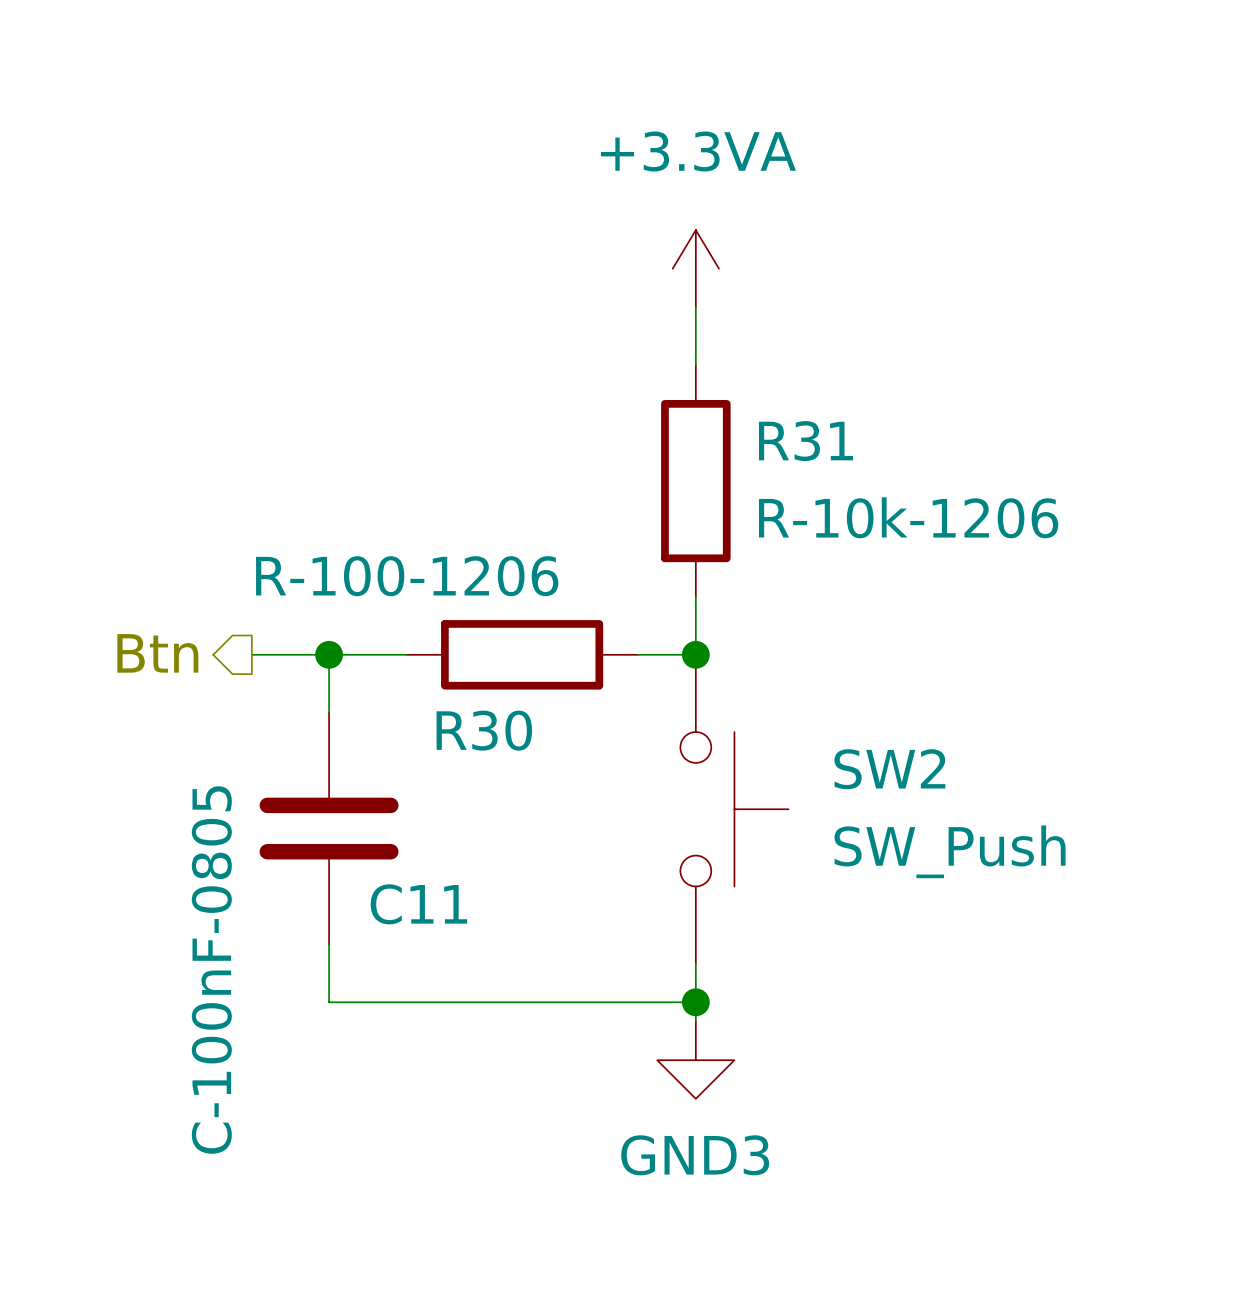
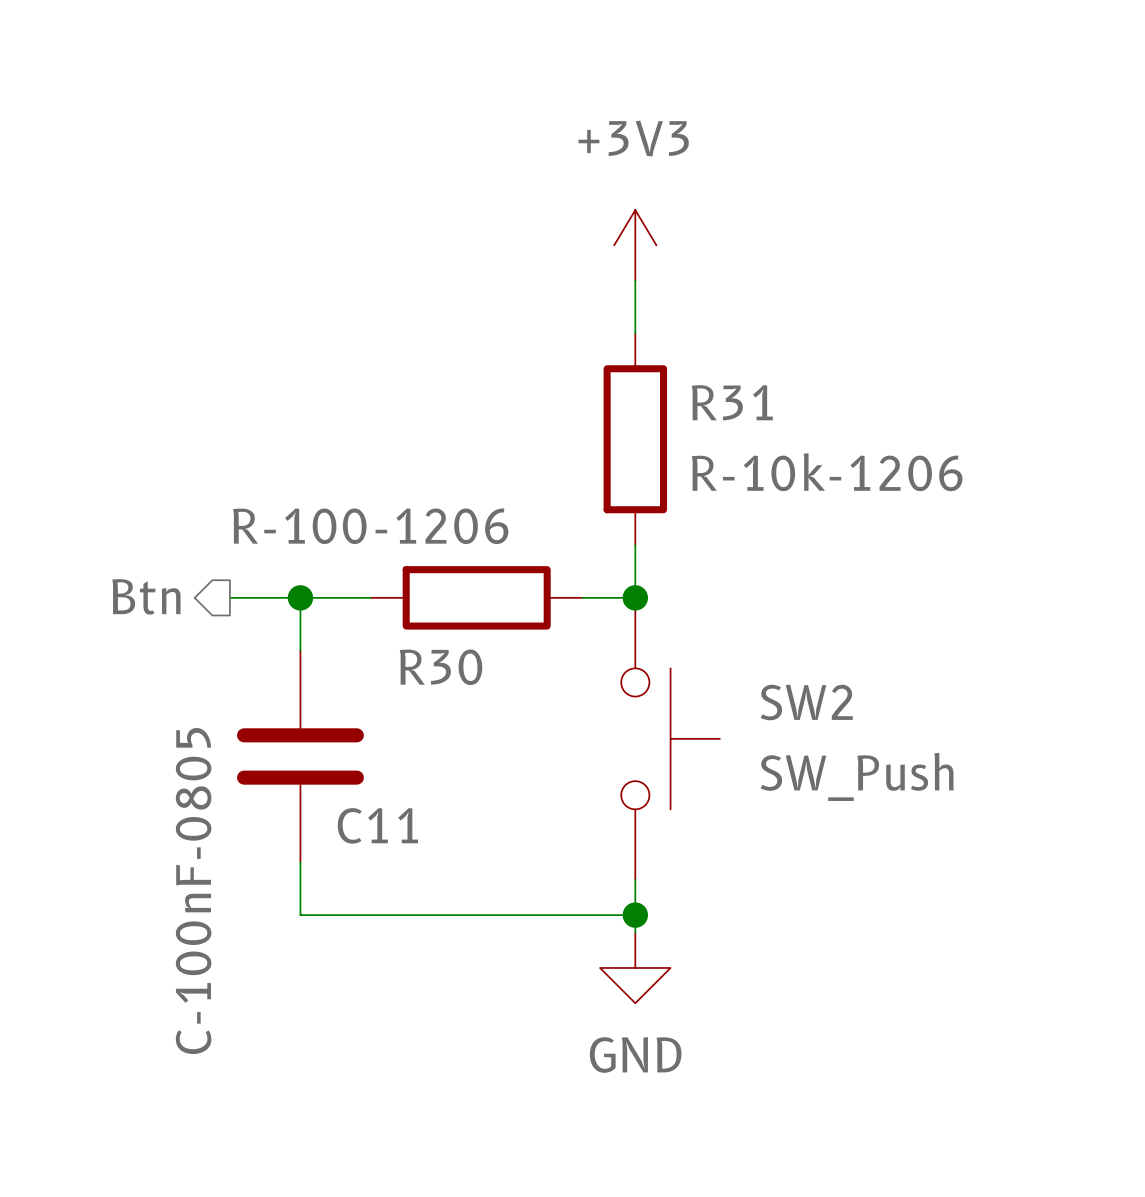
power symbol: +3.3VA (695, 268) -> +3V3 (635, 245)
power symbol: GND3 (695, 1060) -> GND (635, 967)

